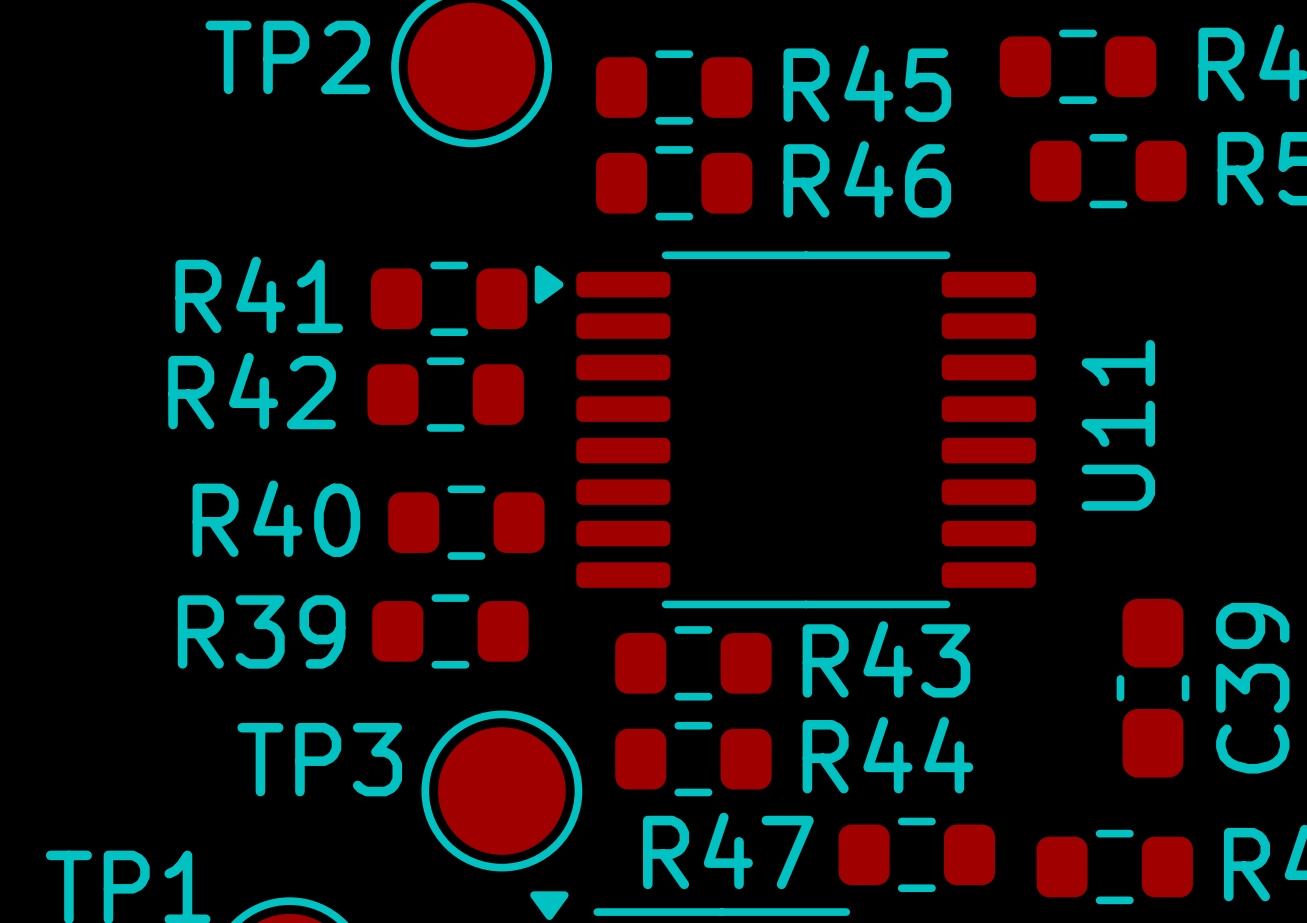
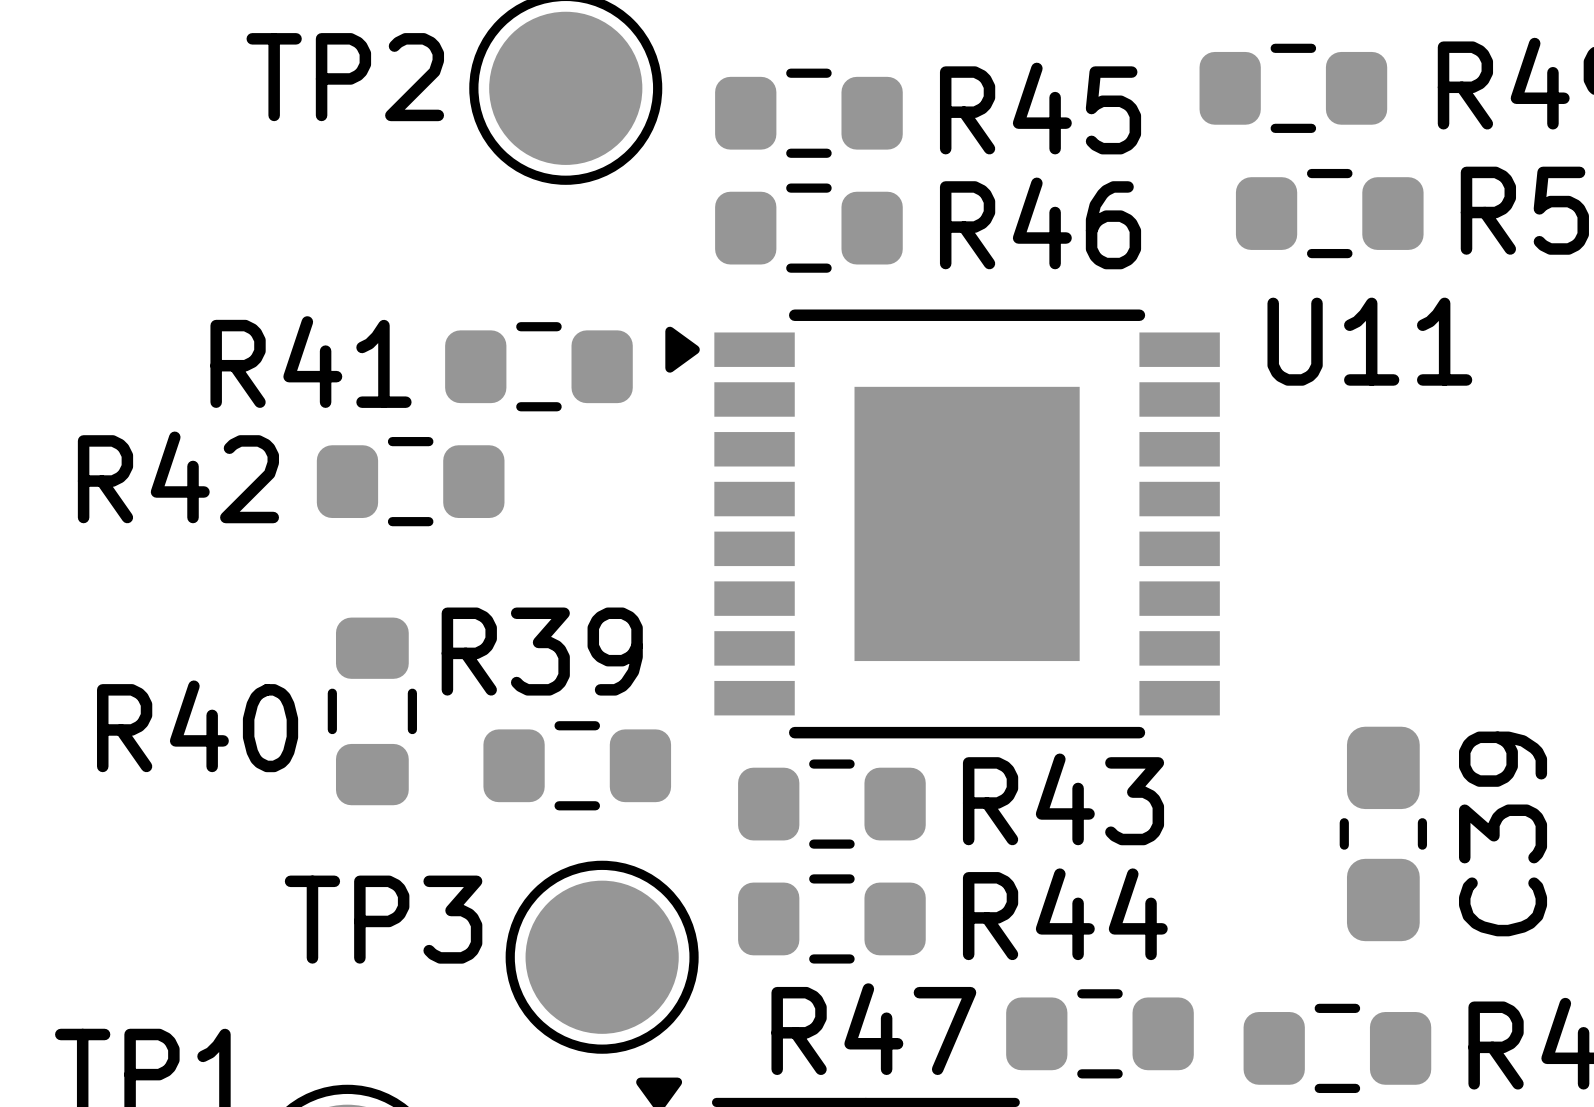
U11 footprint: [534, 251, 1036, 609] -> [665, 309, 1220, 739]
R42 position: (445, 394) -> (410, 481)
U11 name position: U11 (1118, 425) -> U11 (1369, 341)
R40 rotation: 0° (466, 522) -> 90° clockwise (372, 711)
R40 position: (466, 522) -> (372, 711)
R39 name position: R39 (261, 631) -> R39 (542, 651)
R39 position: (450, 631) -> (577, 765)

